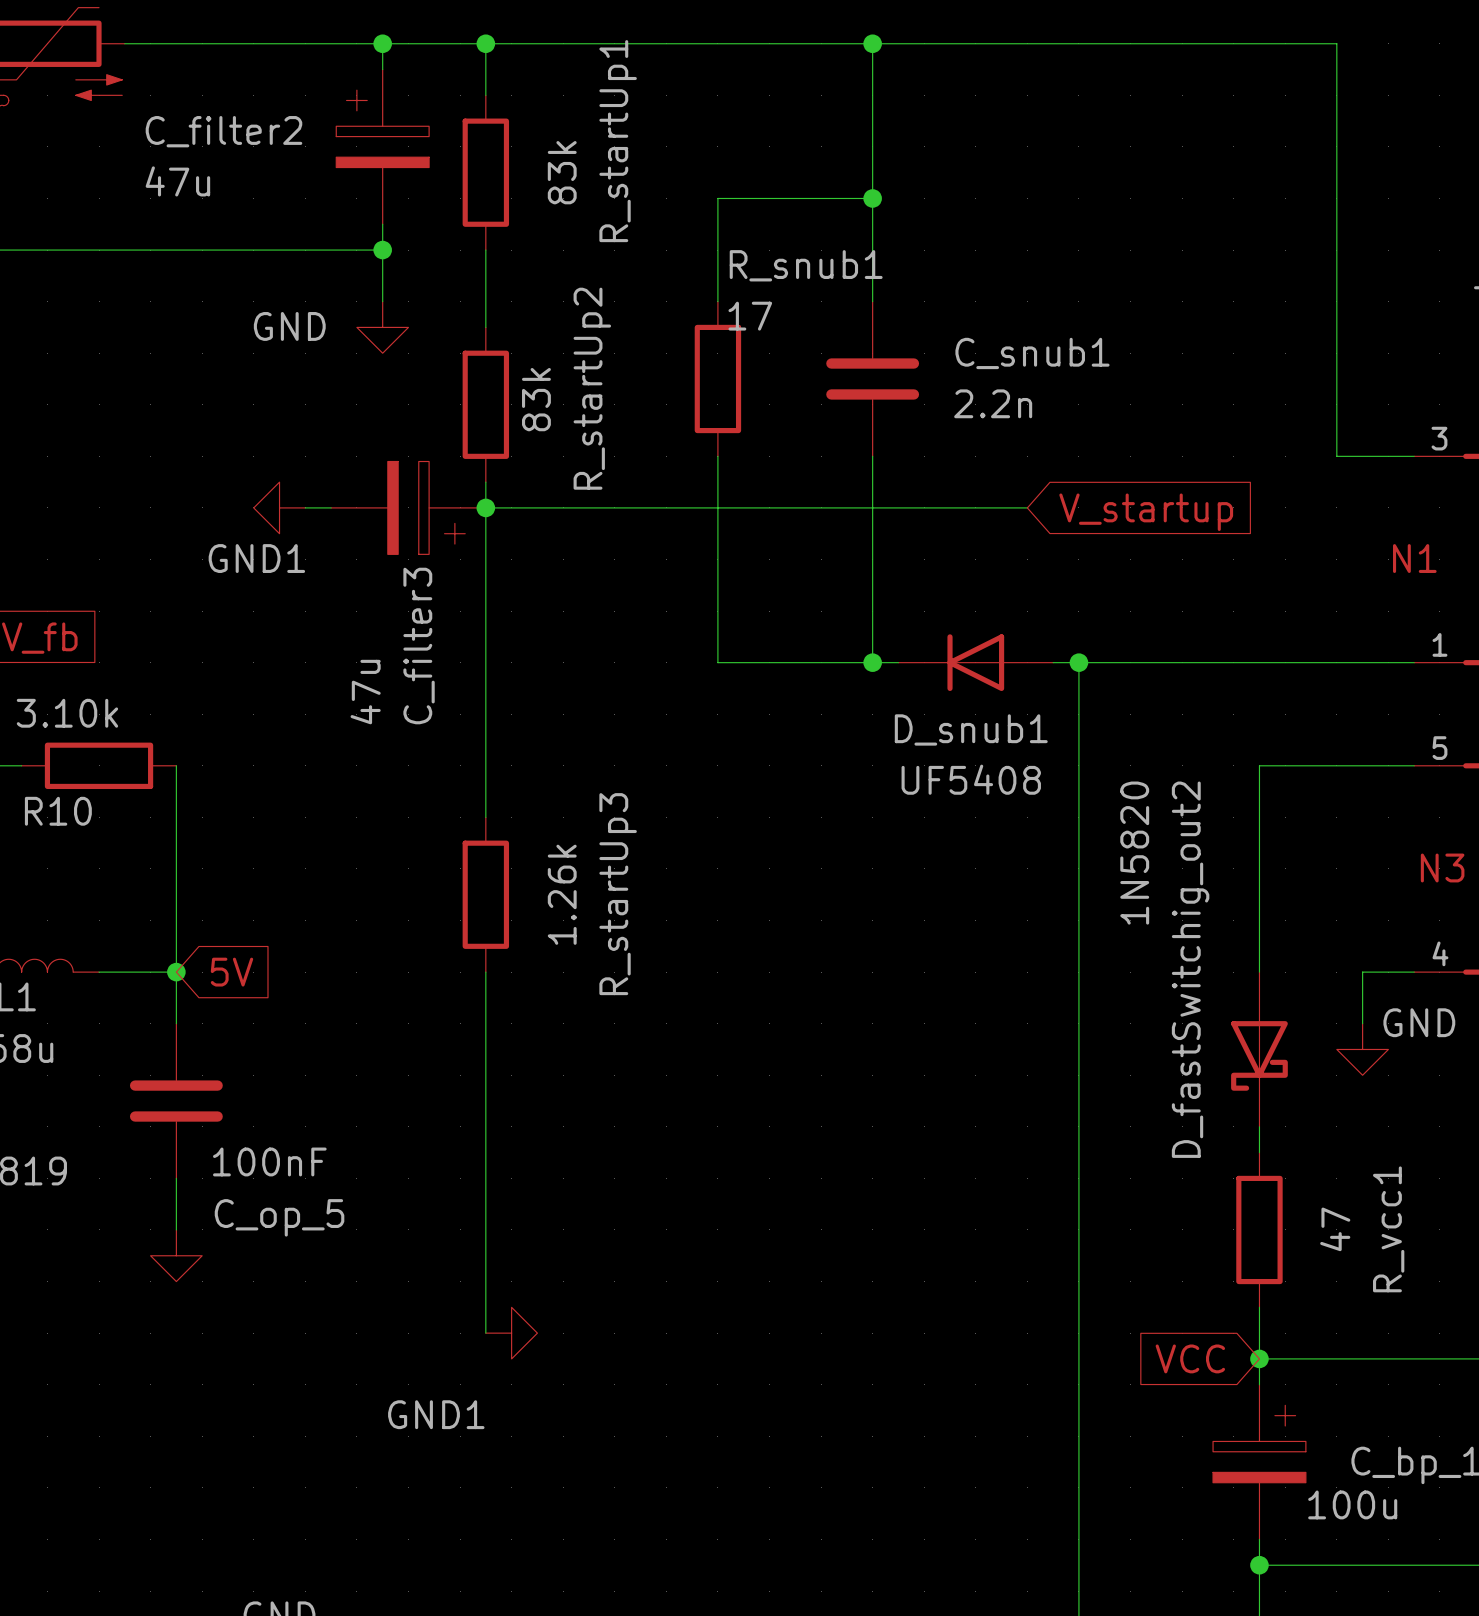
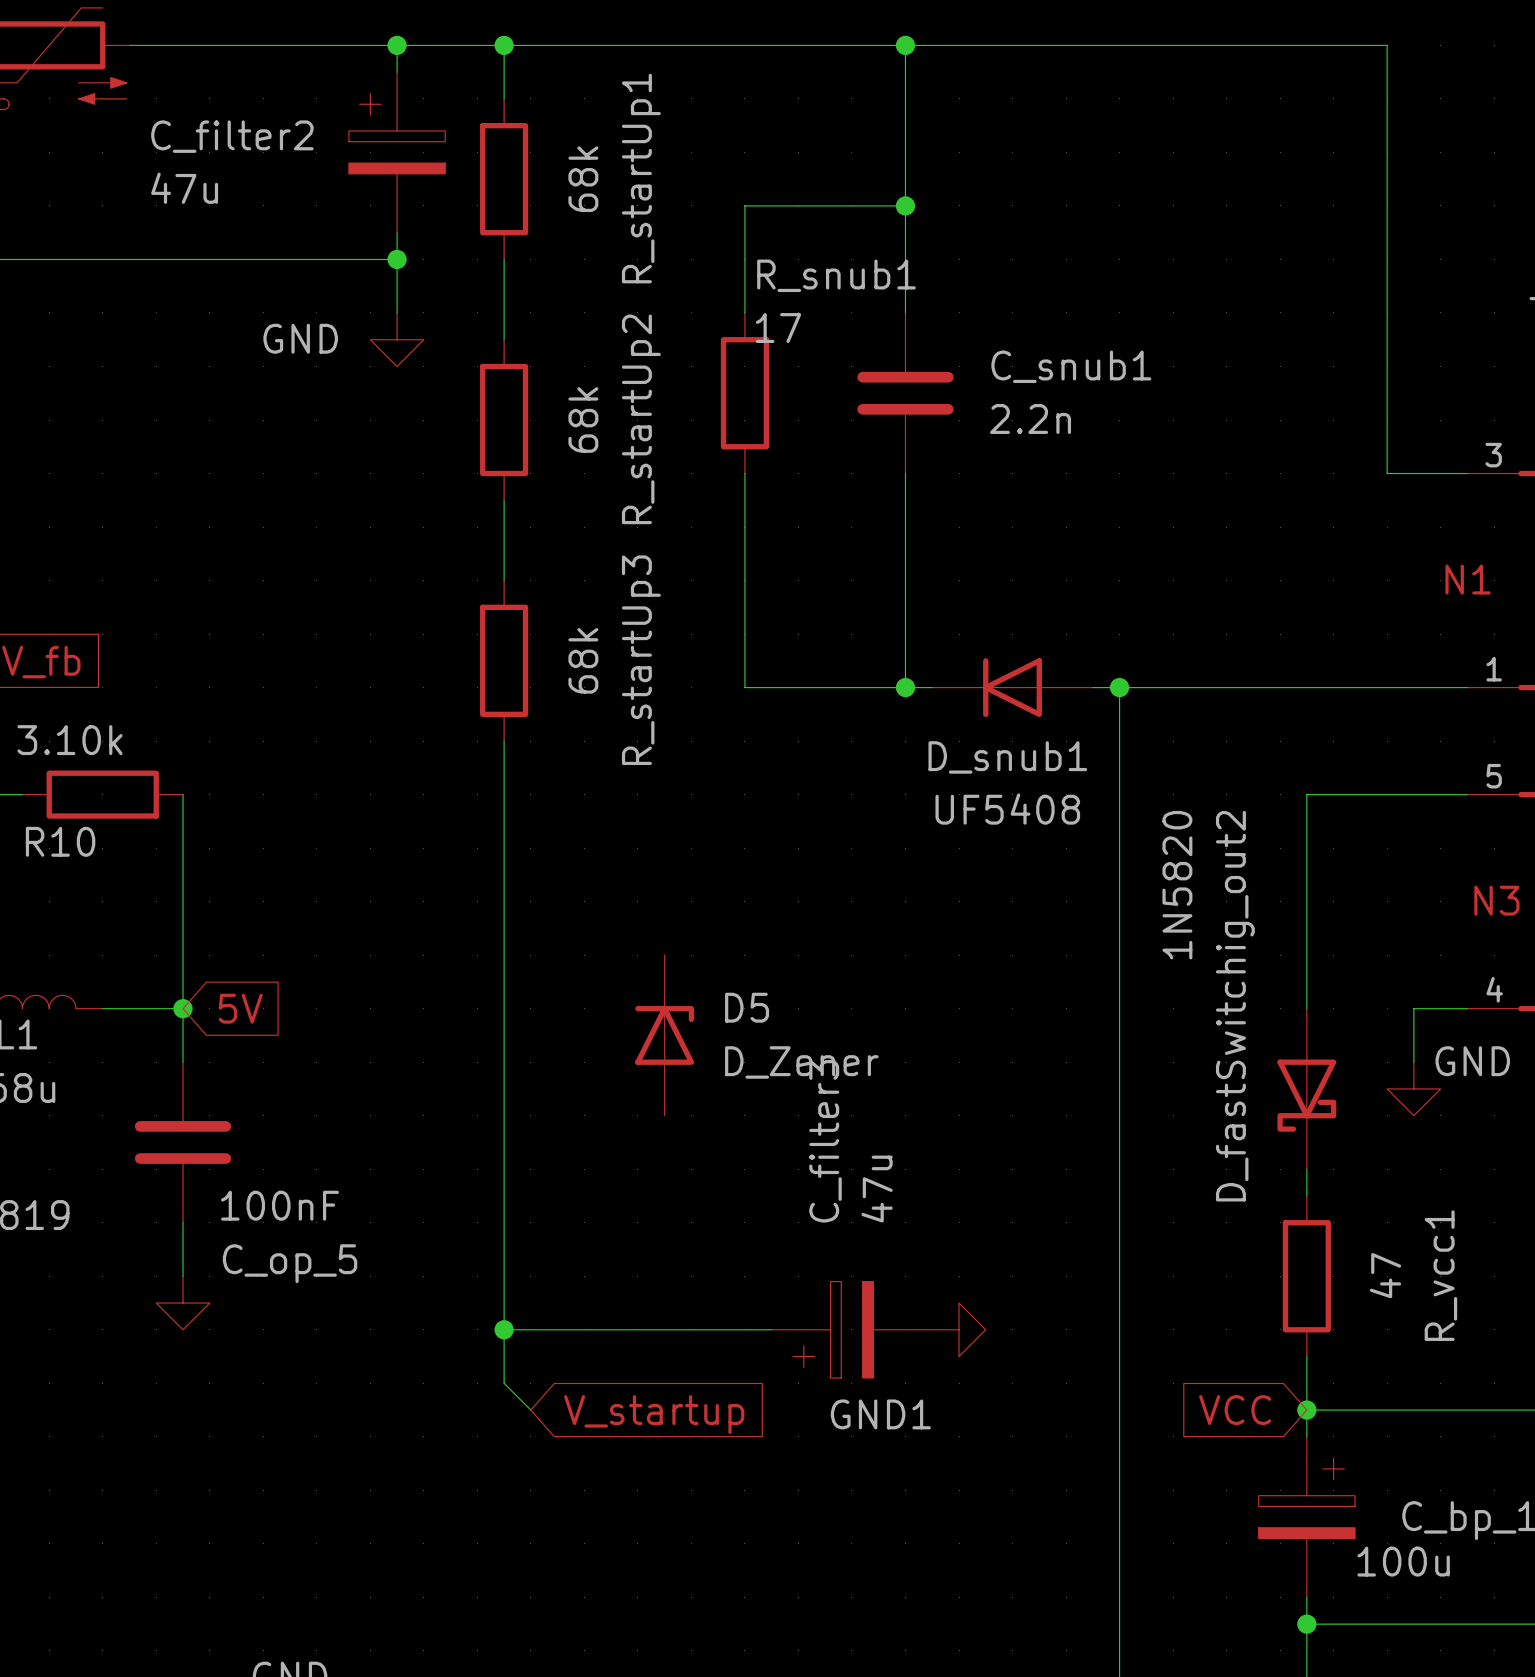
R_startUp1 name position: R_startUp1 (618, 141) -> R_startUp1 (641, 178)
R_startUp1 value: 83k (562, 172) -> 68k (583, 179)
R_startUp2 name position: R_startUp2 (592, 388) -> R_startUp2 (641, 419)
R_startUp2 value: 83k (536, 399) -> 68k (583, 420)
power symbol: GND1 (279, 507) -> none
wire: (305, 507) (331, 507) -> none
C_filter3 position: (408, 507) -> (851, 1329)
C_filter3 flip: as is (426, 507) -> left-right (833, 1329)
wire: (485, 507) (1027, 507) -> none
junction: (485, 507) -> none
global label: V_startup (1146, 512) -> none
wire: (485, 559) (485, 714) -> (504, 848) (504, 1008)
C_filter3 name position: C_filter3 (419, 646) -> C_filter3 (825, 1141)
C_filter3 value position: 47u (365, 692) -> 47u (877, 1189)
R_startUp3 position: (485, 894) -> (504, 660)
R_startUp3 value: 1.26k (562, 894) -> 68k (583, 660)
D5: none -> D_Zener (664, 1035)
wire: none -> (504, 1329) (771, 1329)
junction: none -> (504, 1329)
wire: none -> (504, 1383) (530, 1410)
power symbol position: GND1 (511, 1333) -> GND1 (959, 1329)
global label: none -> V_startup (654, 1414)

